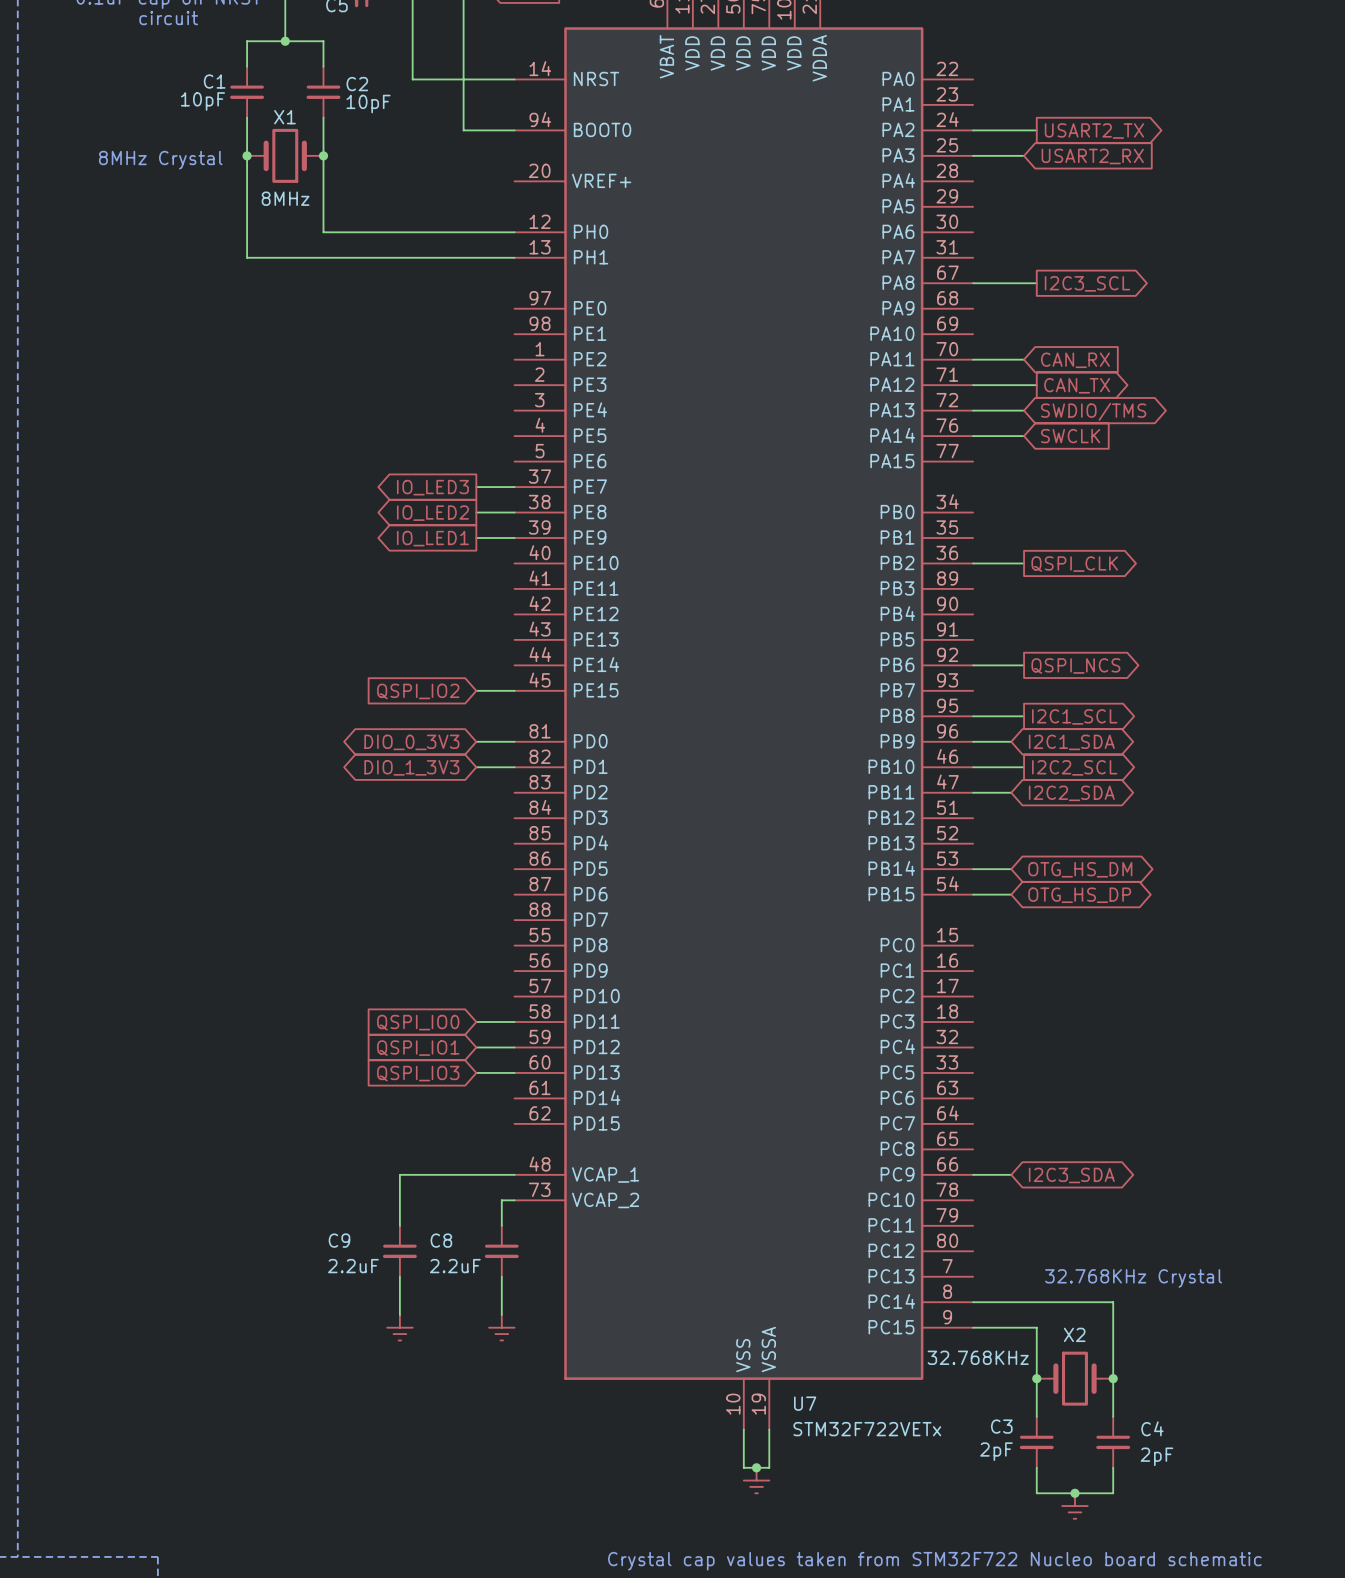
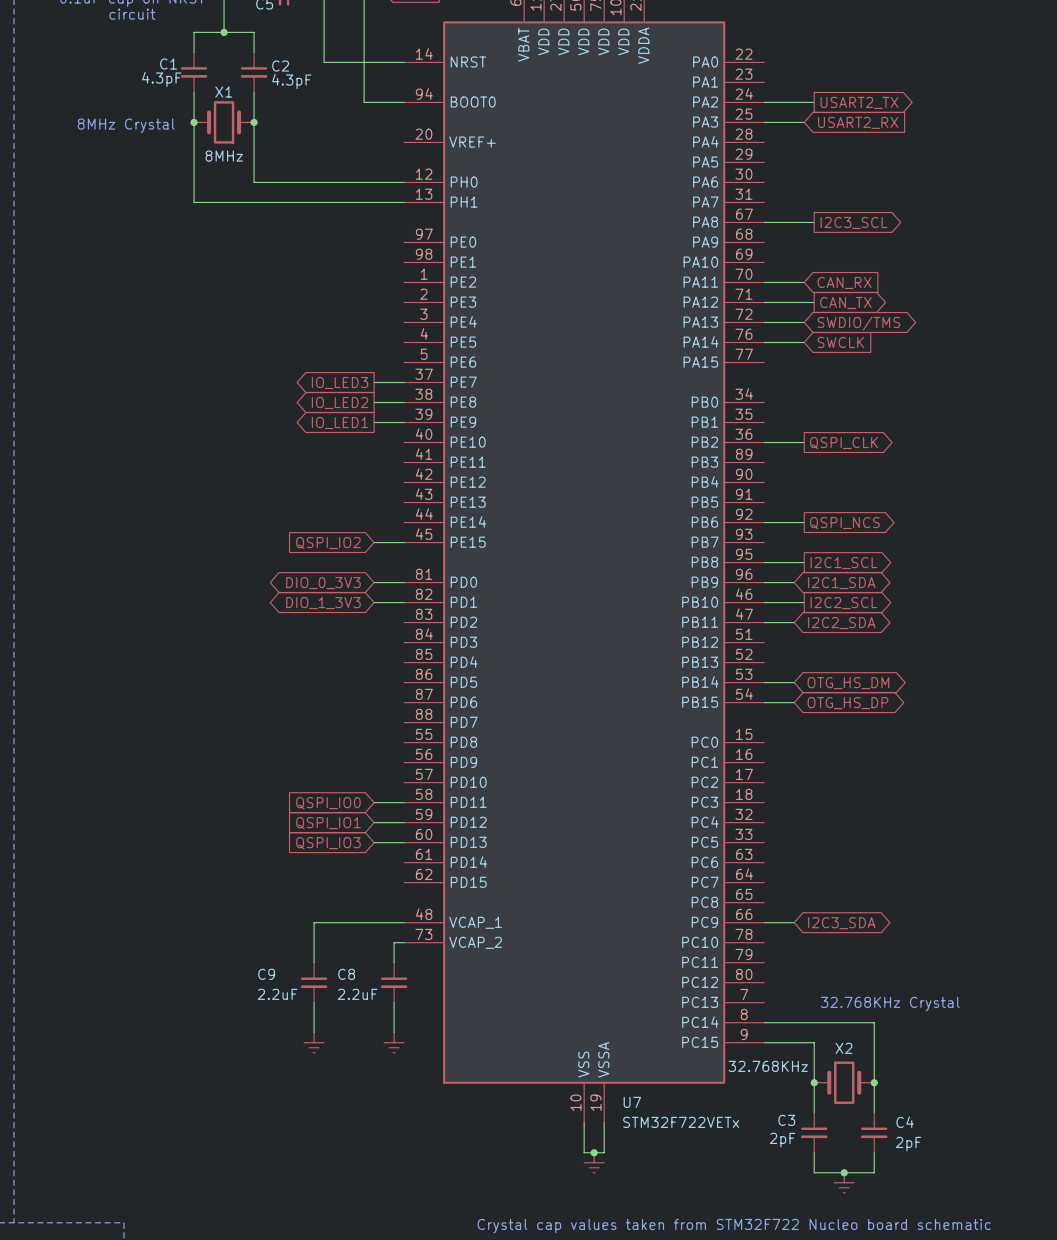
C1 value: 10pF (202, 101) -> 4.3pF (161, 79)
C2 value: 10pF (368, 104) -> 4.3pF (291, 81)

